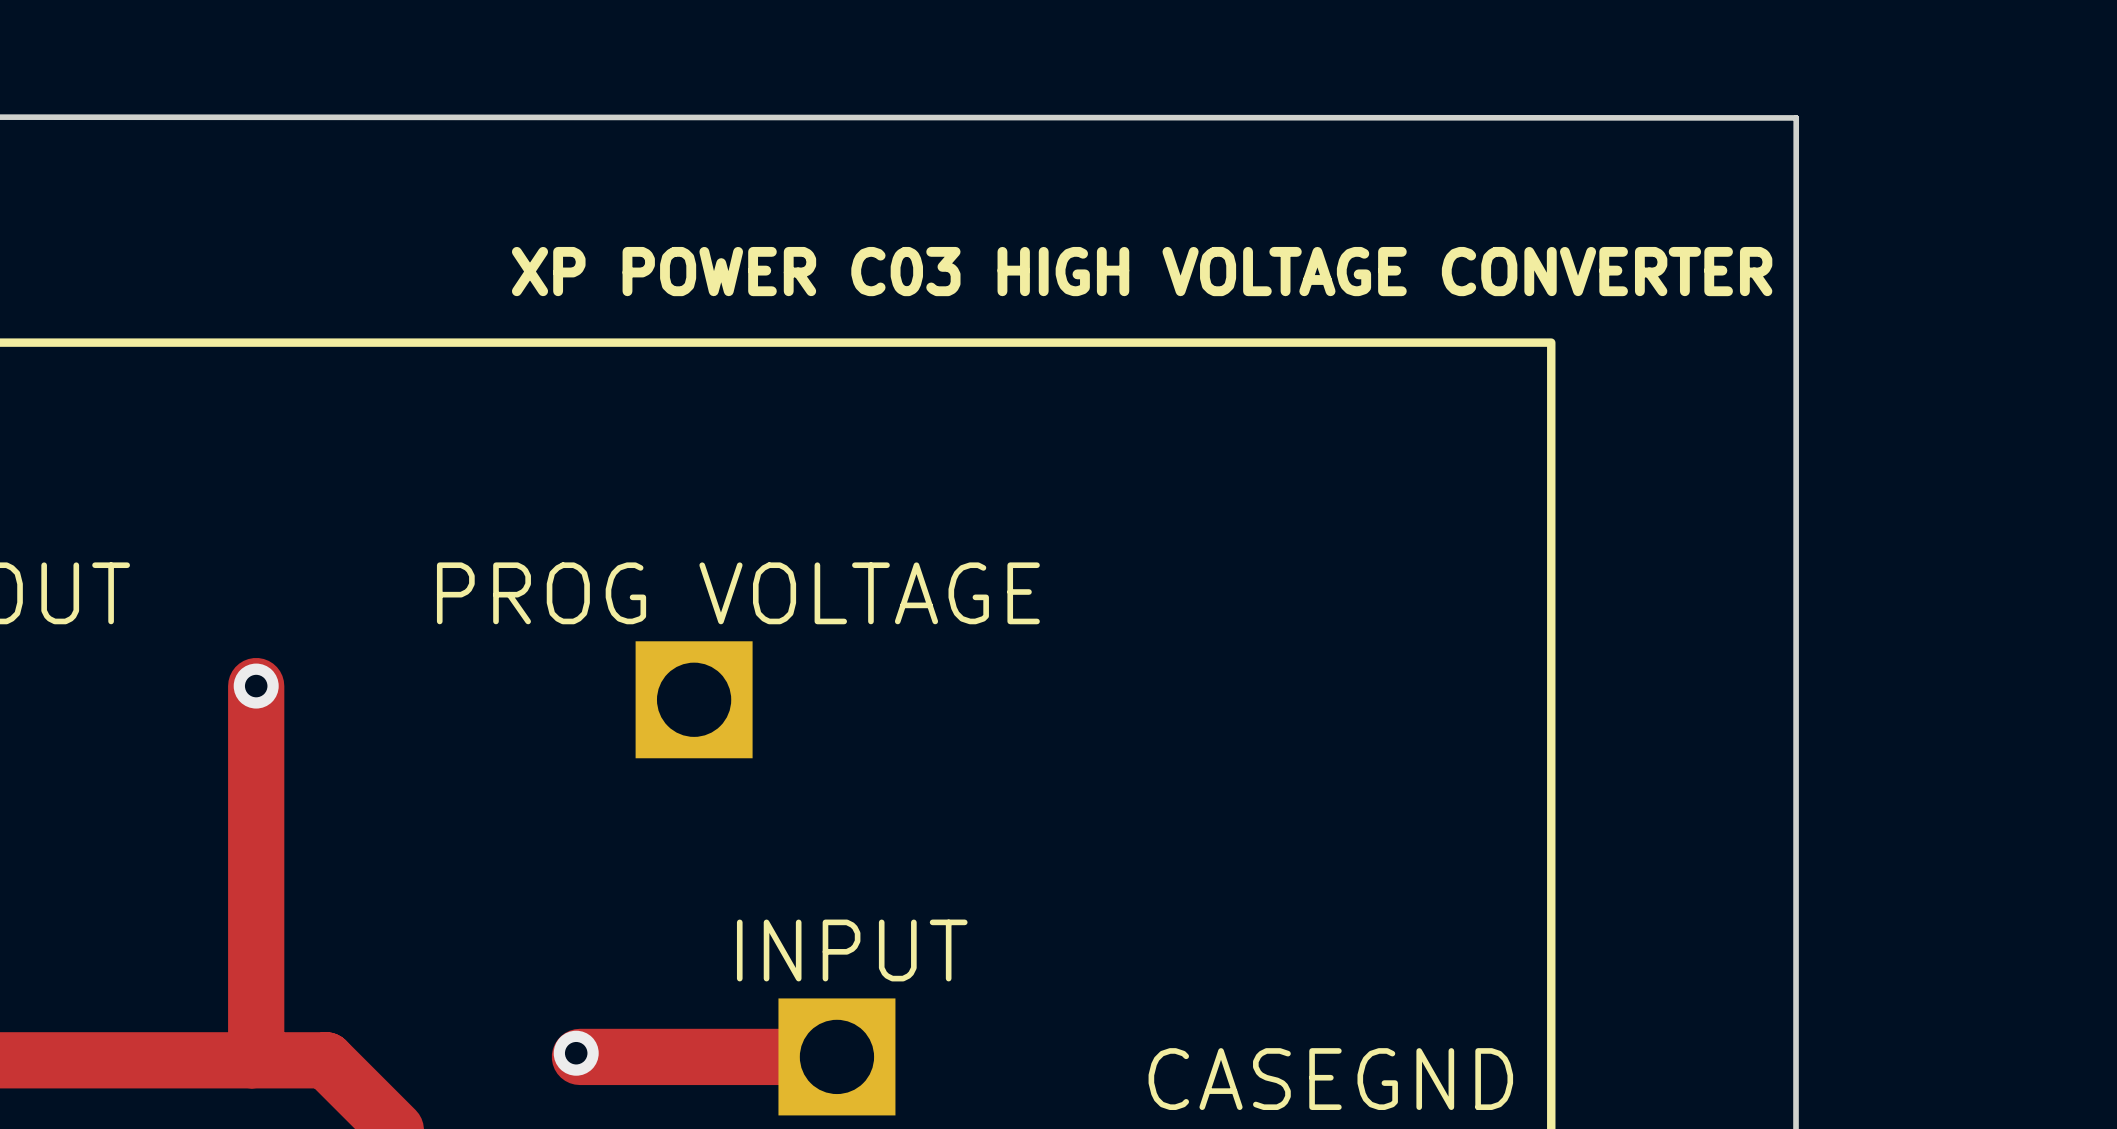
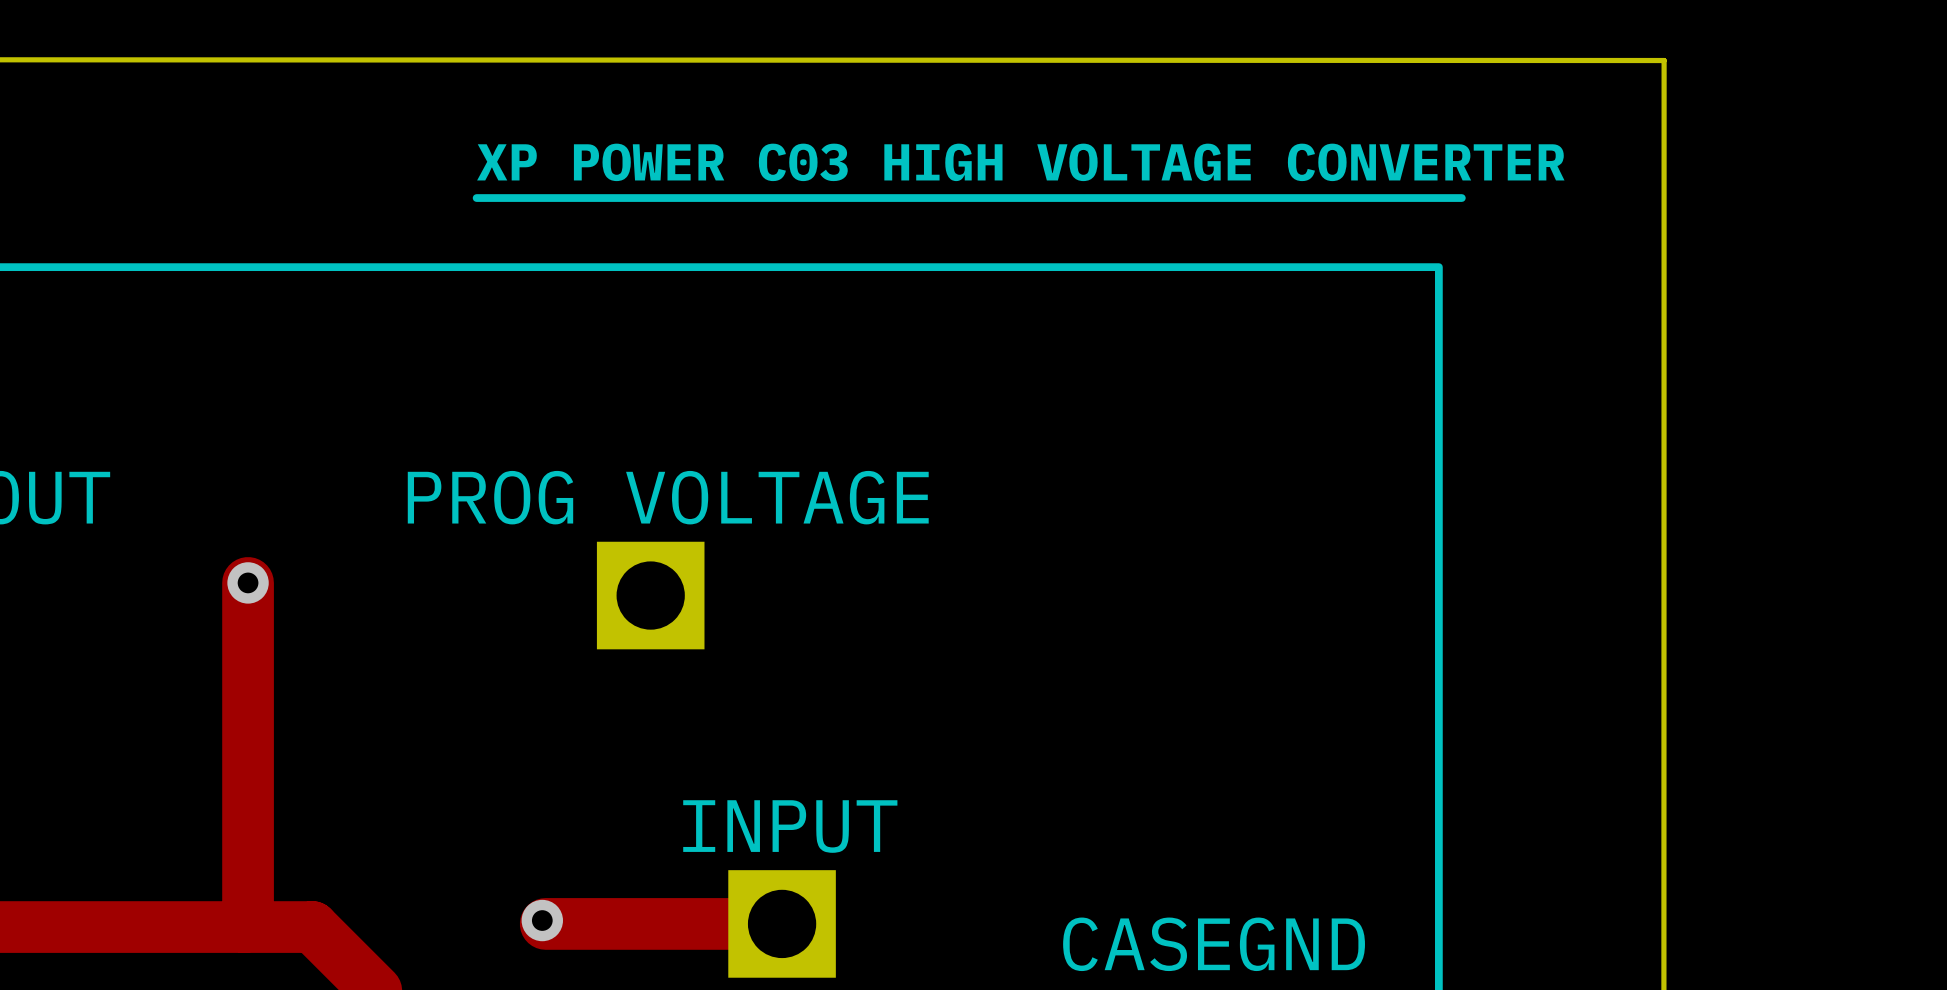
line: none -> (476, 198) (1461, 198)
text position: XP POWER C03 HIGH VOLTAGE CONVERTER (1142, 271) -> XP POWER C03 HIGH VOLTAGE CONVERTER (1020, 162)

